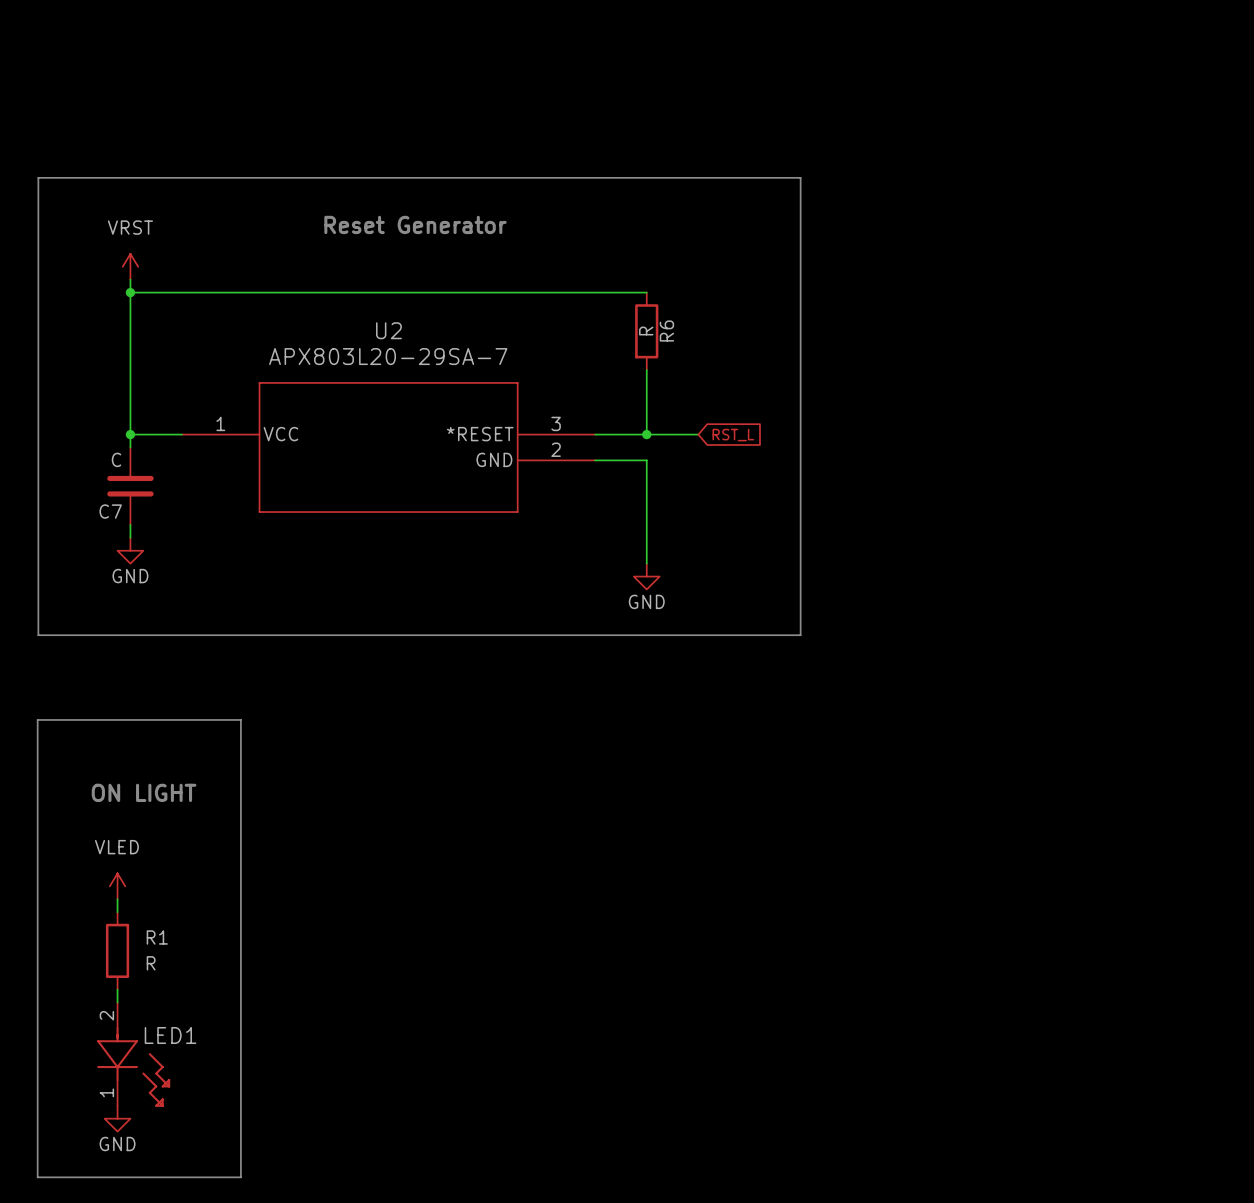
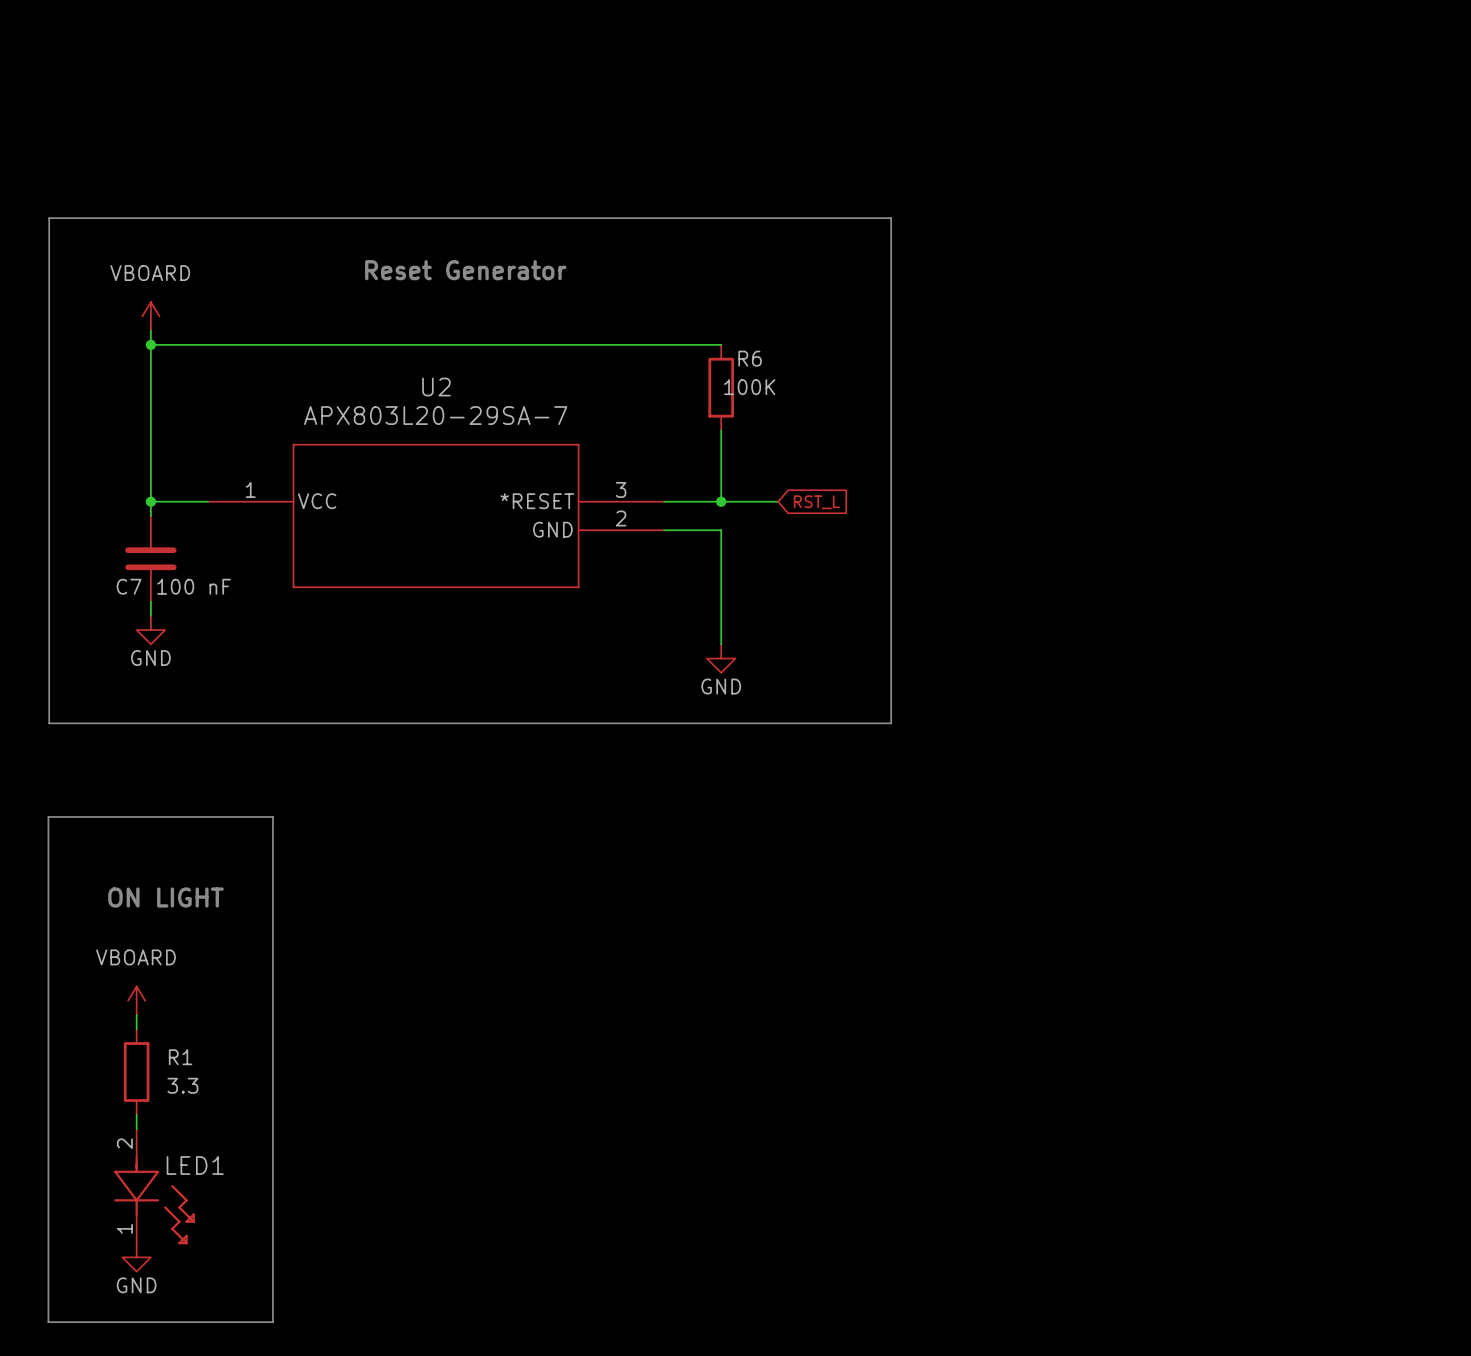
power symbol: VRST (130, 266) -> VBOARD (150, 316)
R6 value: R (646, 331) -> 100K (749, 387)
R6 name rotation: 0° (666, 331) -> 90° clockwise (750, 358)
C7 value: C (116, 459) -> 100 nF (194, 586)
power symbol: VLED (117, 886) -> VBOARD (136, 1000)
R1 value: R (151, 963) -> 3.3 (182, 1085)

